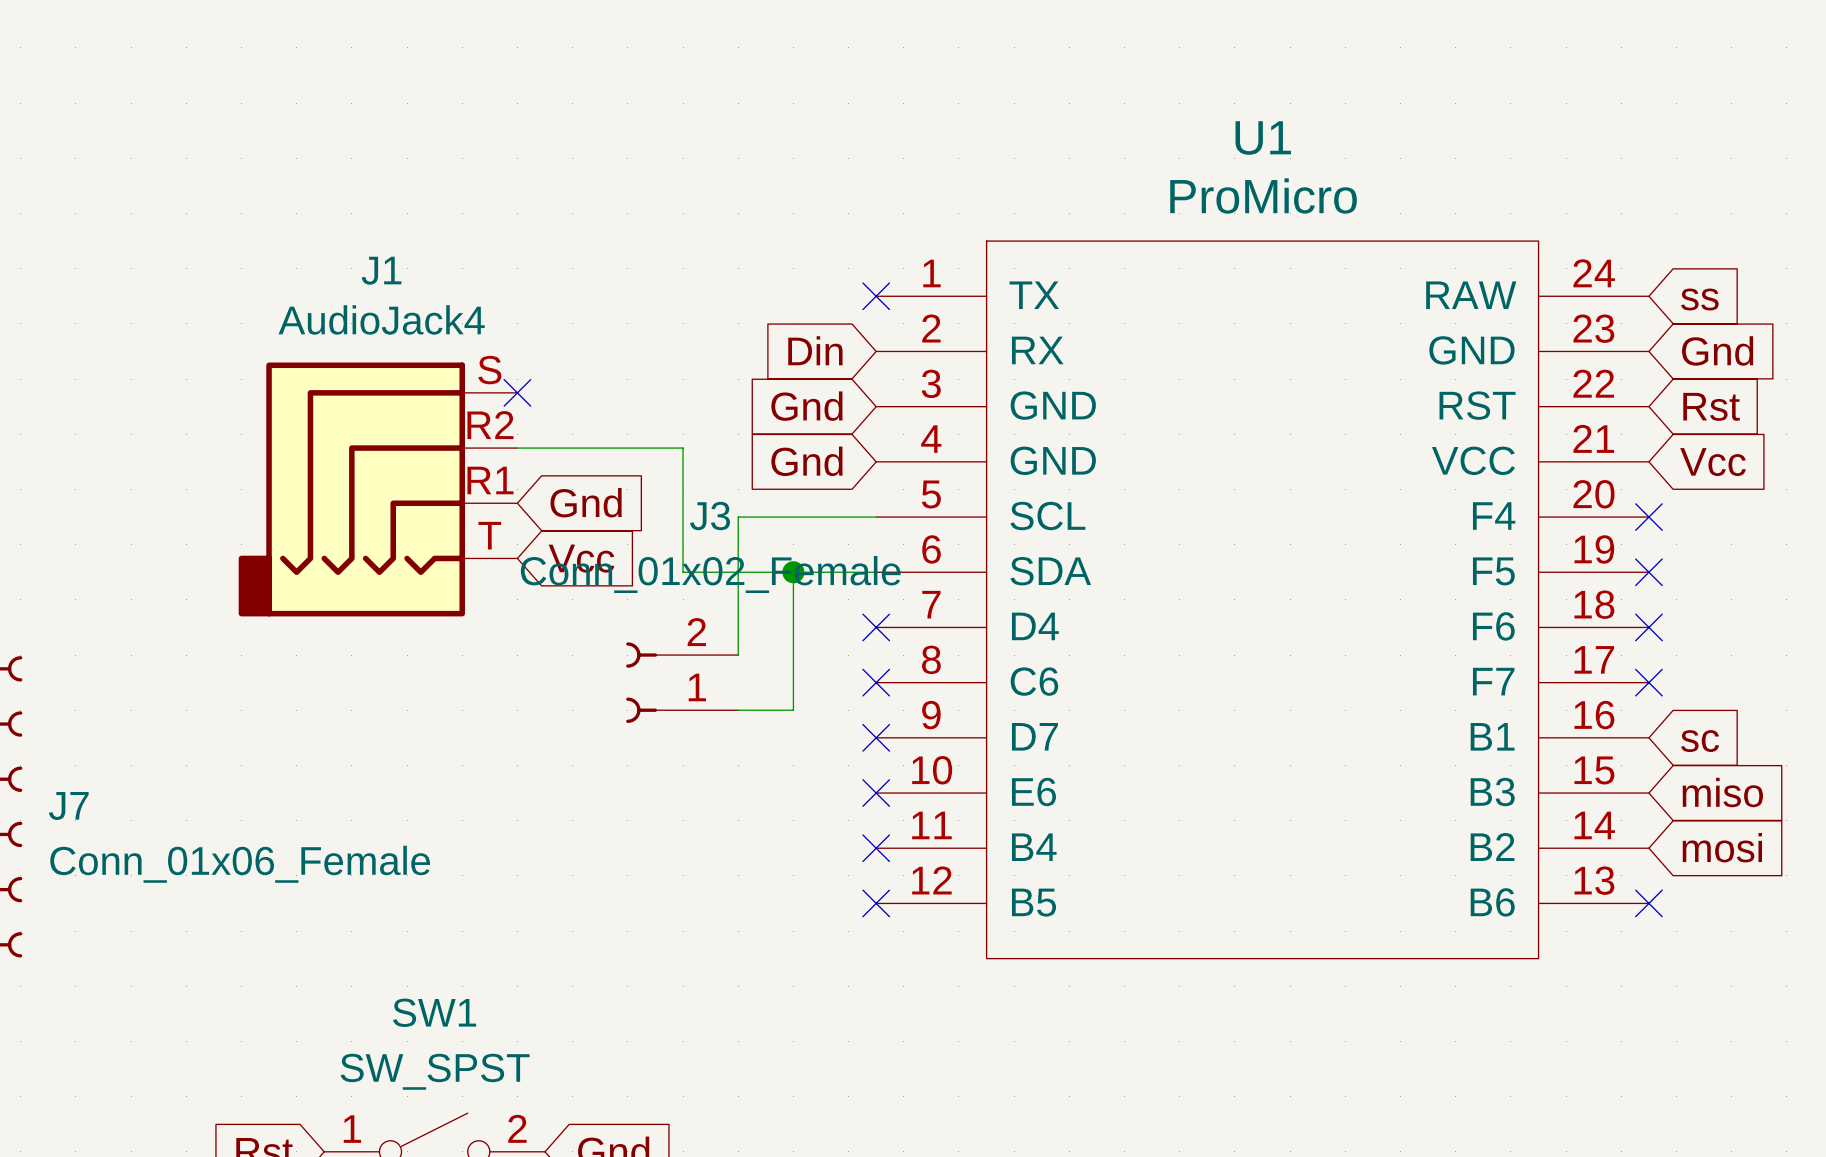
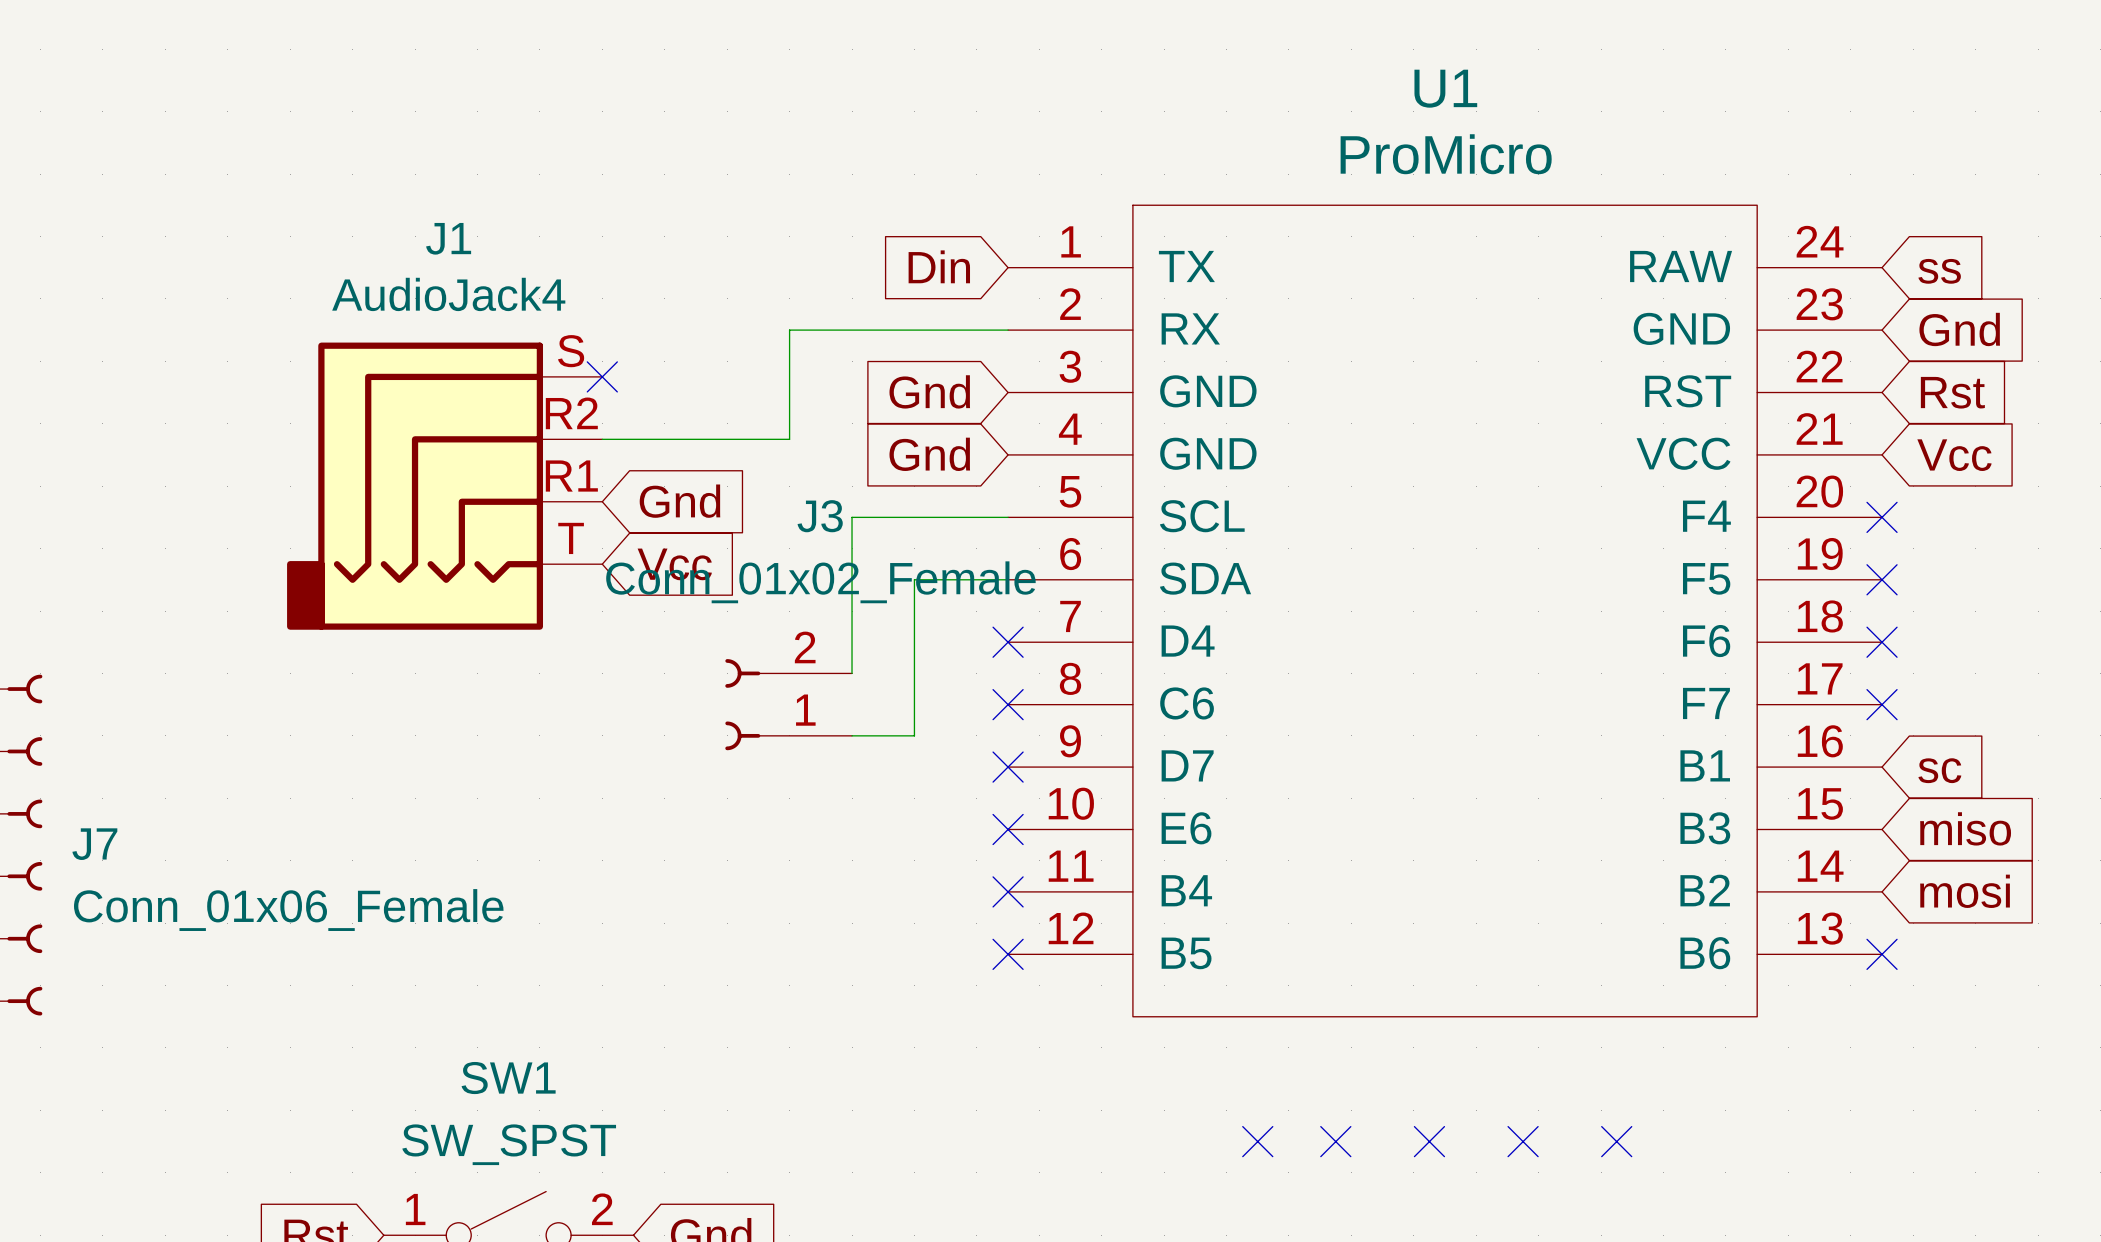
no-connect mark: (876, 296) -> none
global label position: Din (815, 350) -> Din (939, 266)
wire: (683, 448) (683, 572) (793, 572) -> (789, 439) (789, 330) (1008, 330)
junction: (793, 572) -> none
no-connect mark: none -> (1257, 1141)
no-connect mark: none -> (1335, 1141)
no-connect mark: none -> (1429, 1141)
no-connect mark: none -> (1523, 1141)
no-connect mark: none -> (1616, 1141)

